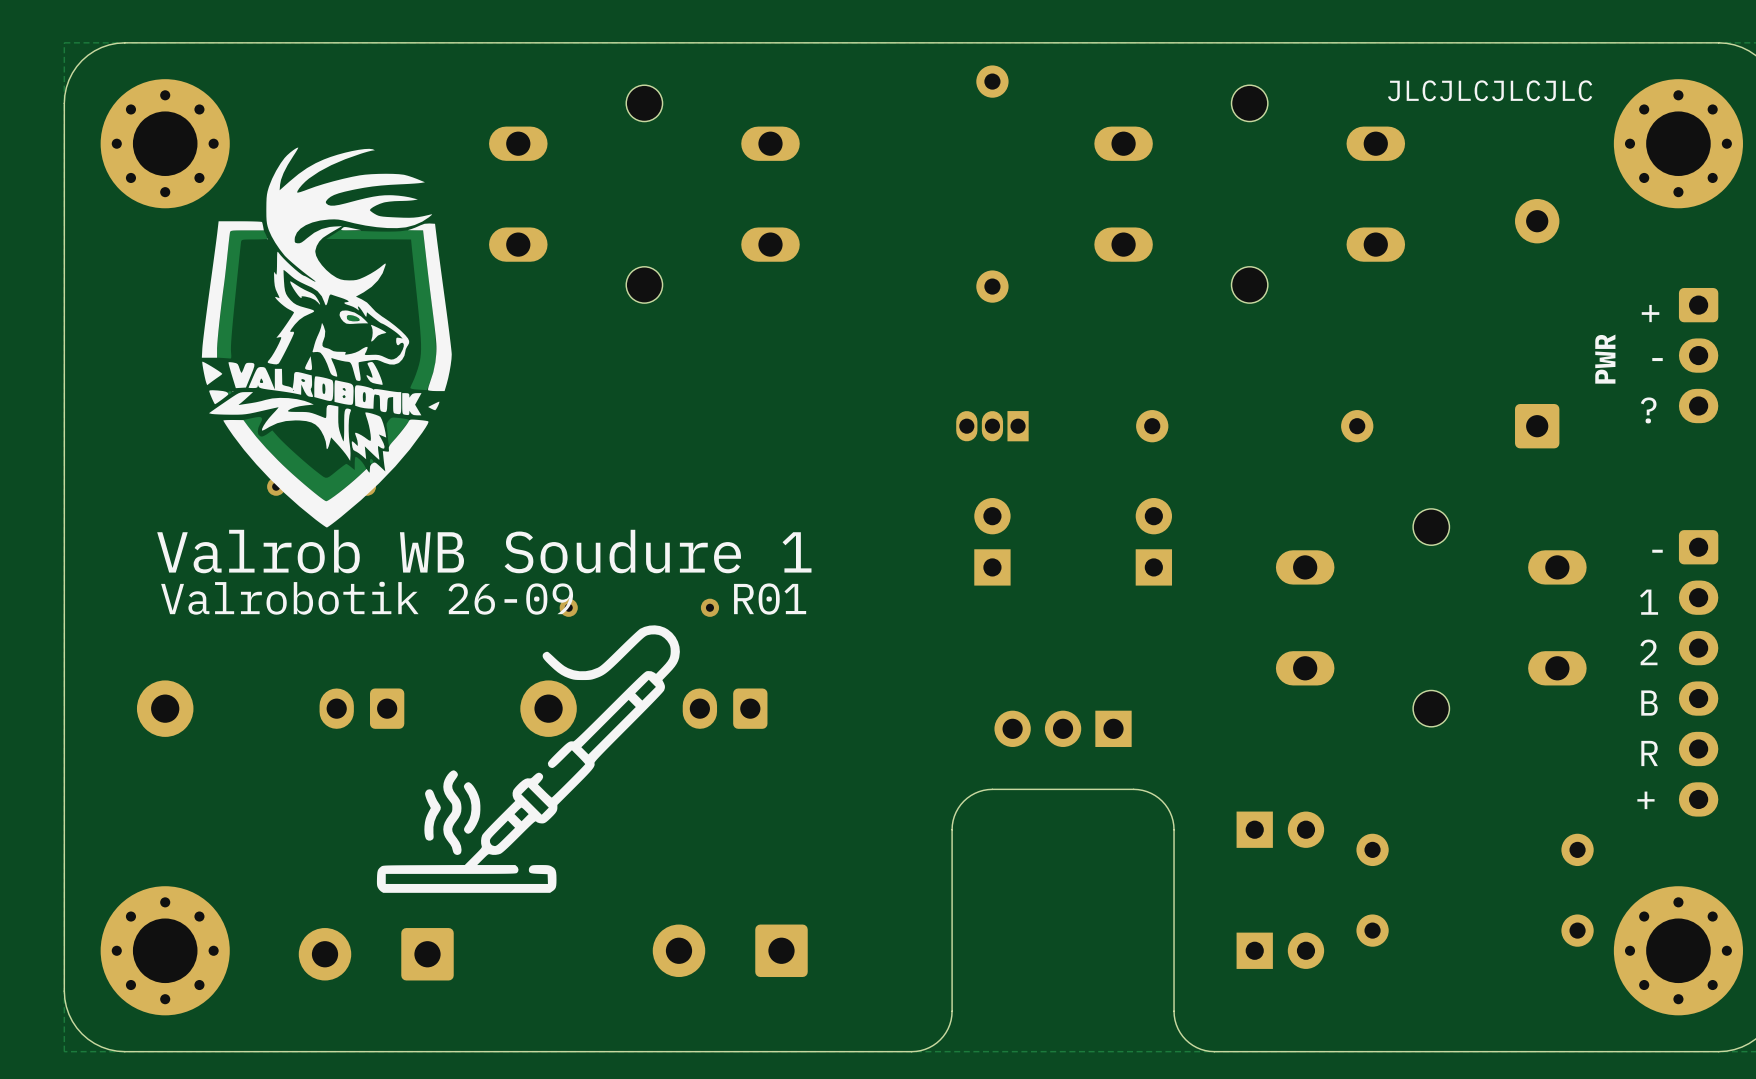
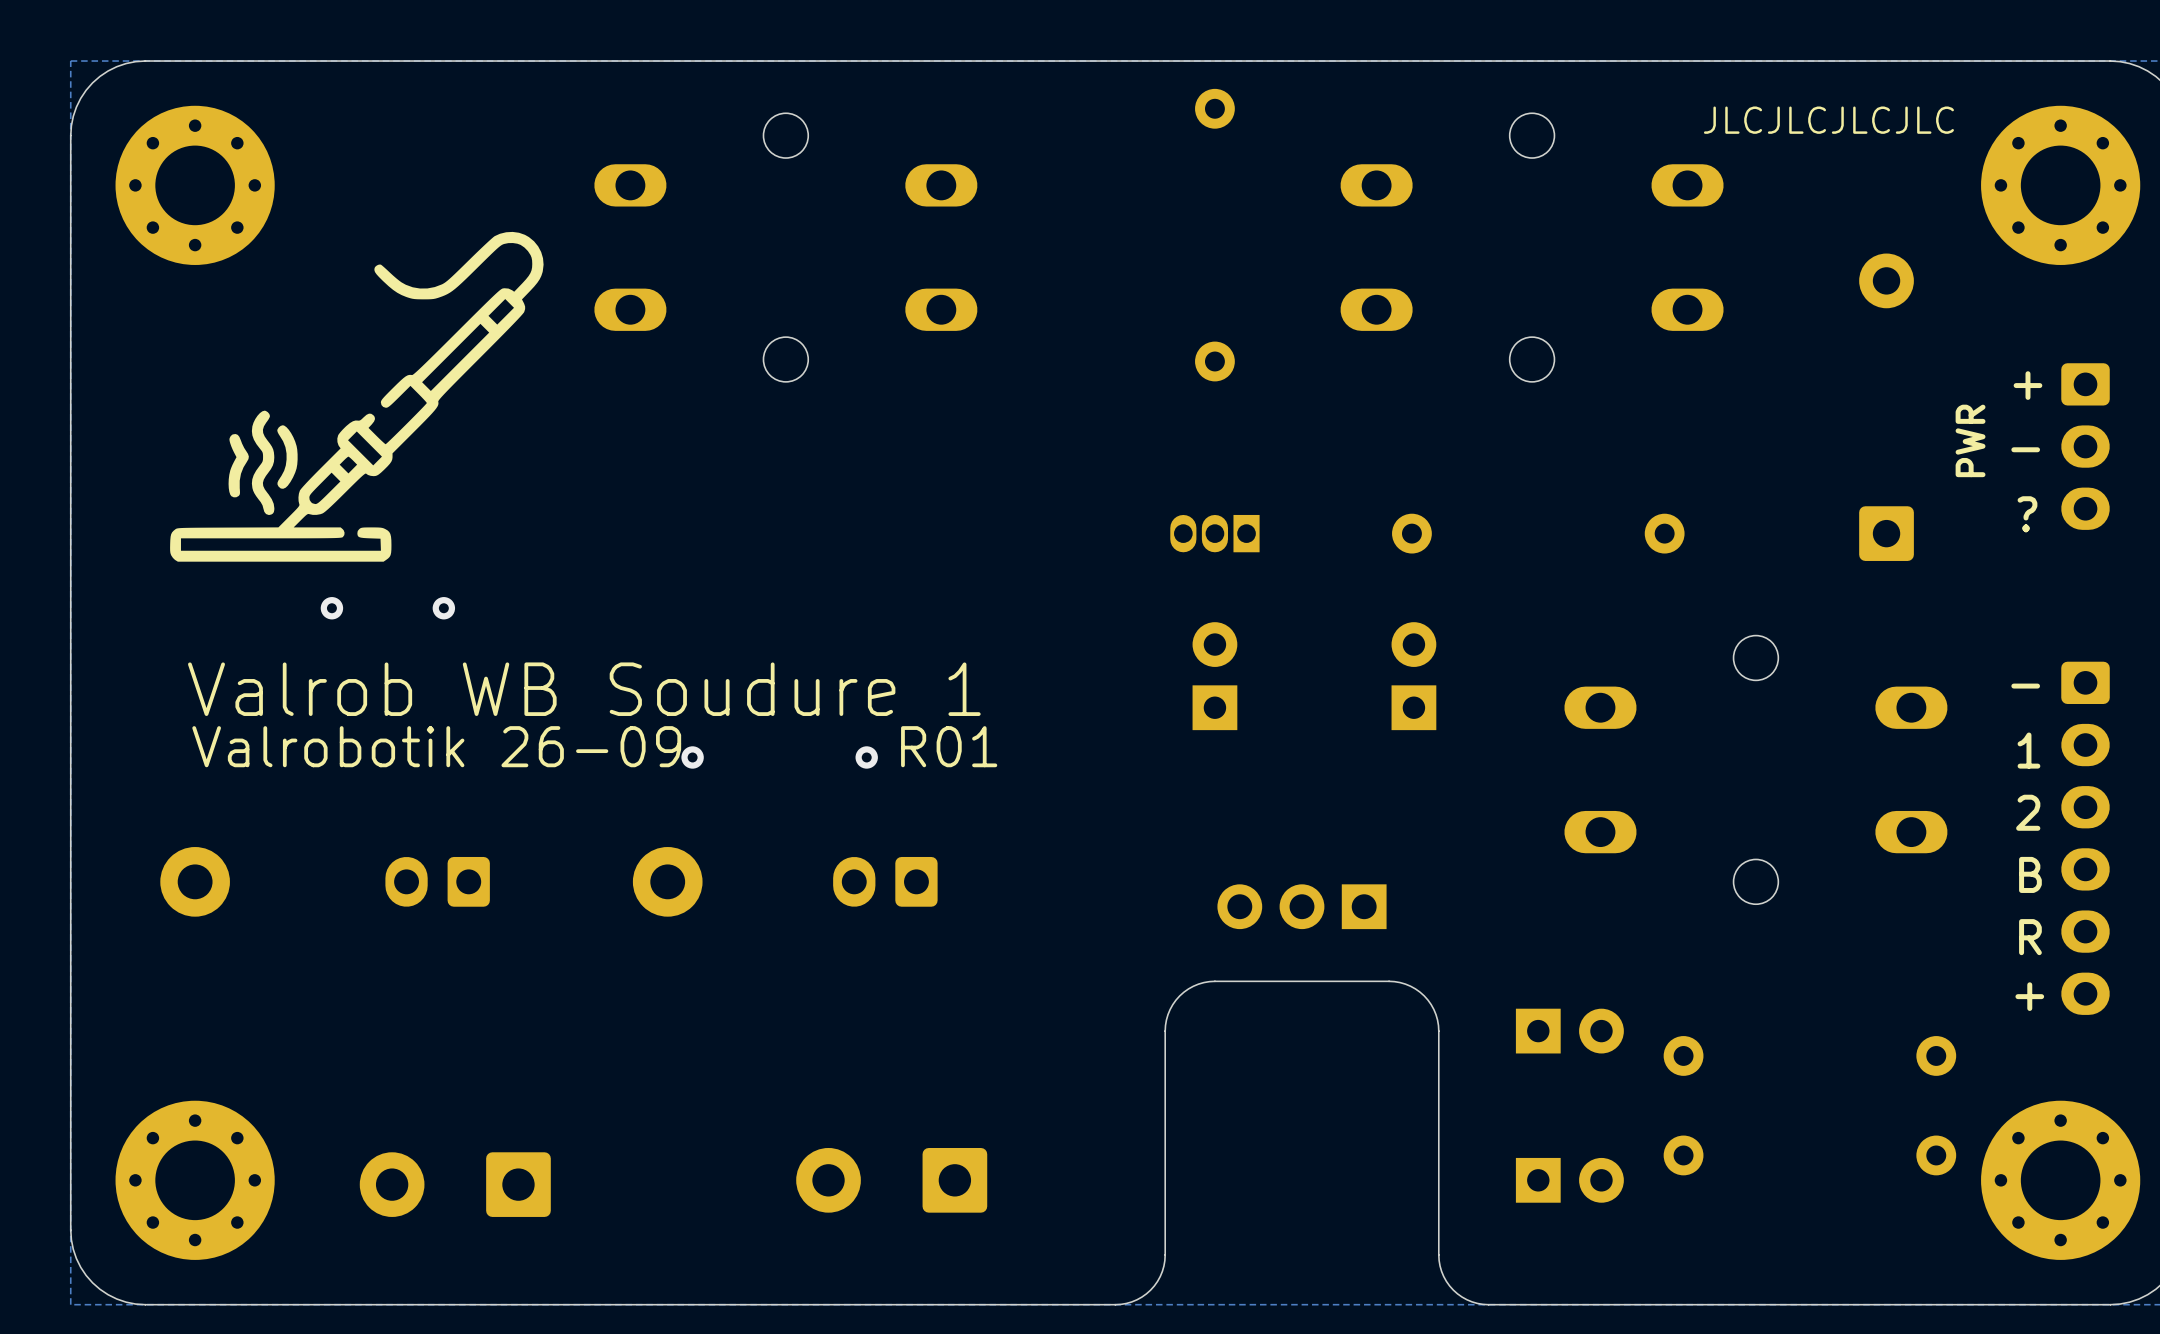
drawing: [201, 147, 452, 528] -> none
drawing position: (528, 759) -> (356, 396)

